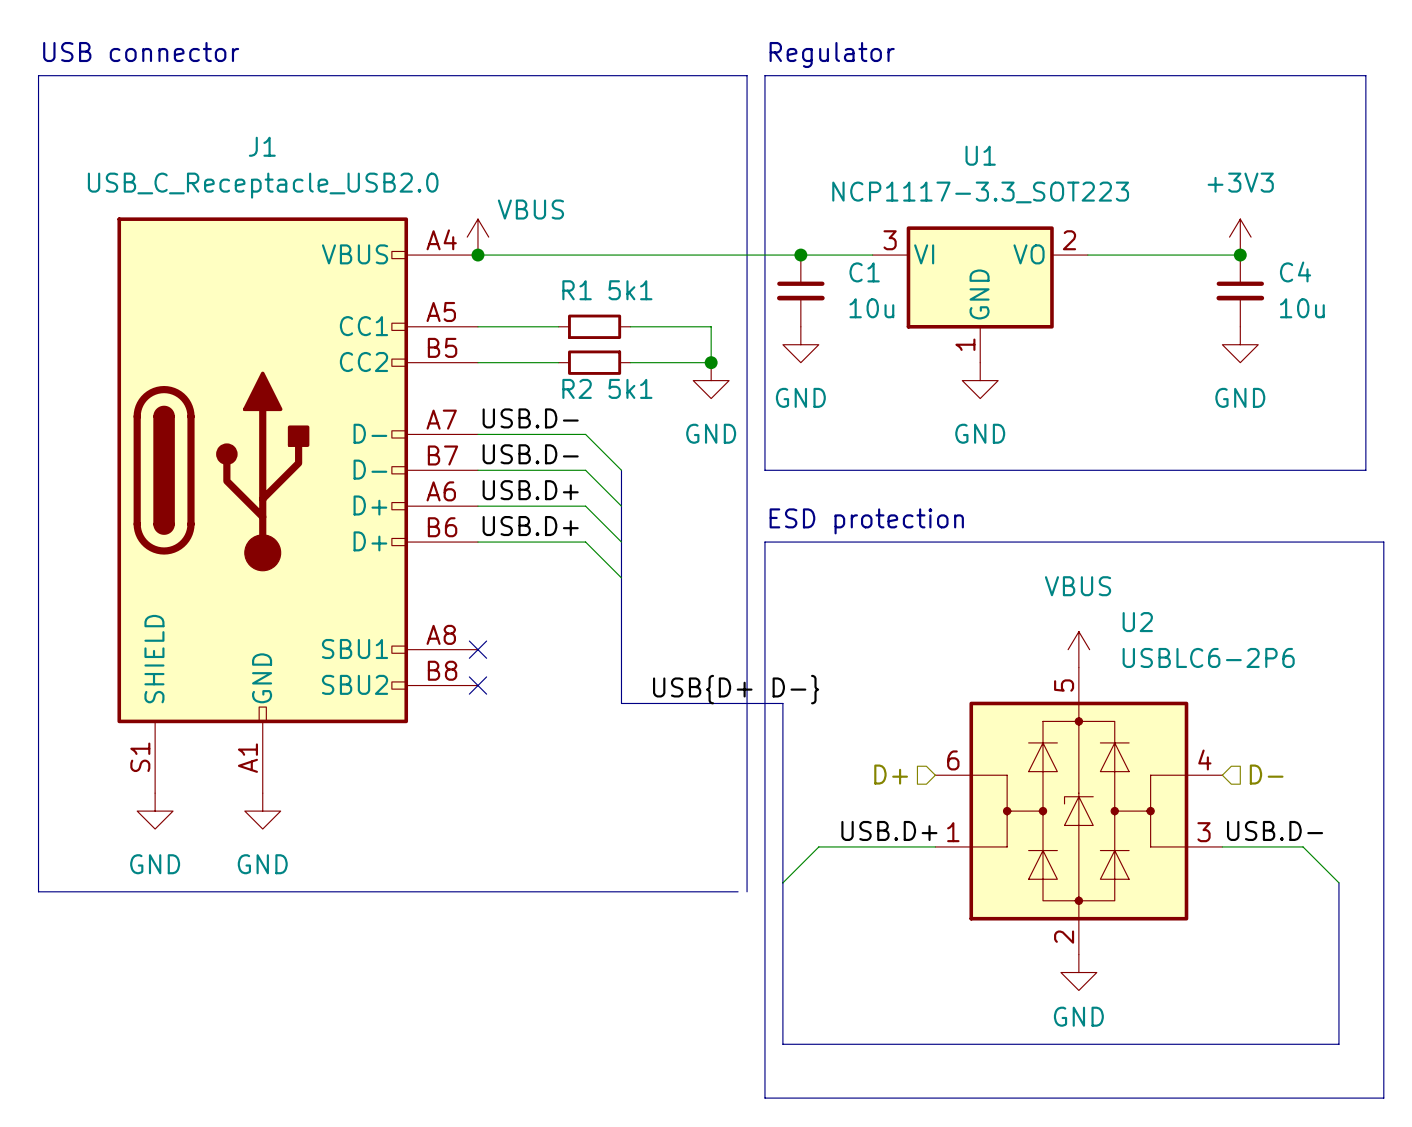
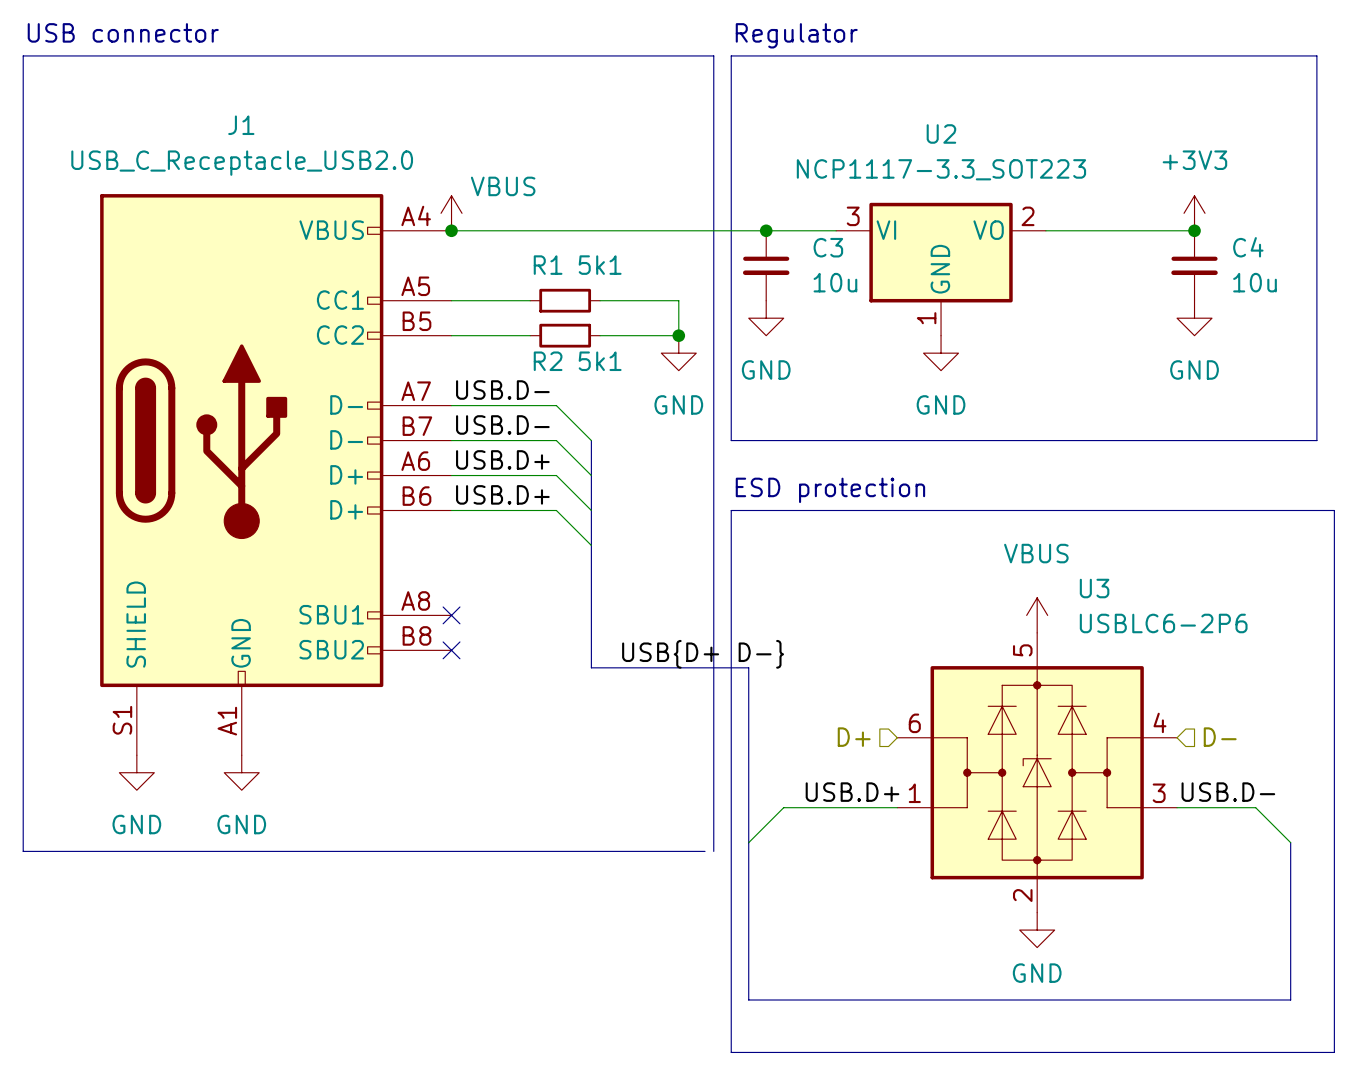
U1 name: U1 (980, 155) -> U2 (941, 133)
C1 name: C1 (864, 272) -> C3 (828, 247)
U2 name: U2 (1137, 622) -> U3 (1094, 588)

